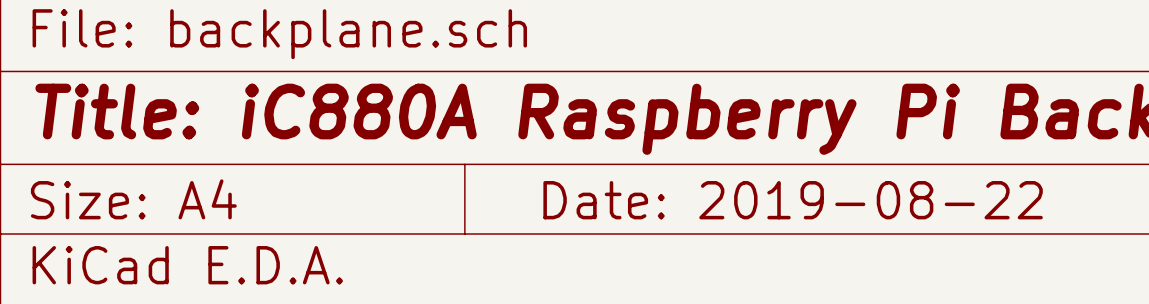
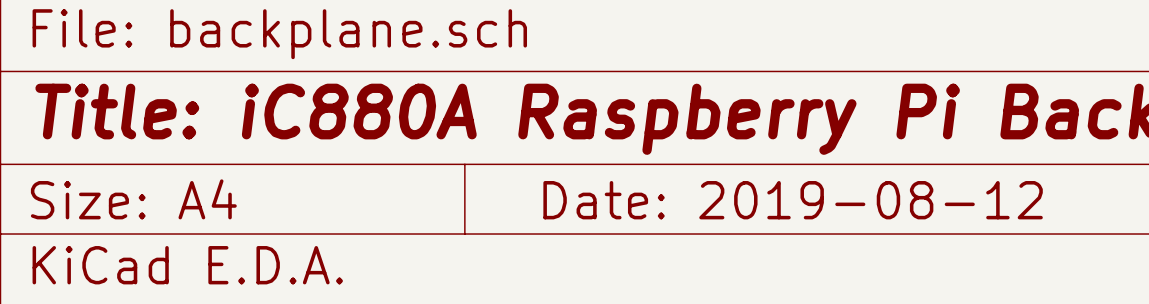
title block: Date: 2019-08-22 (793, 200) -> Date: 2019-08-12 (793, 200)

